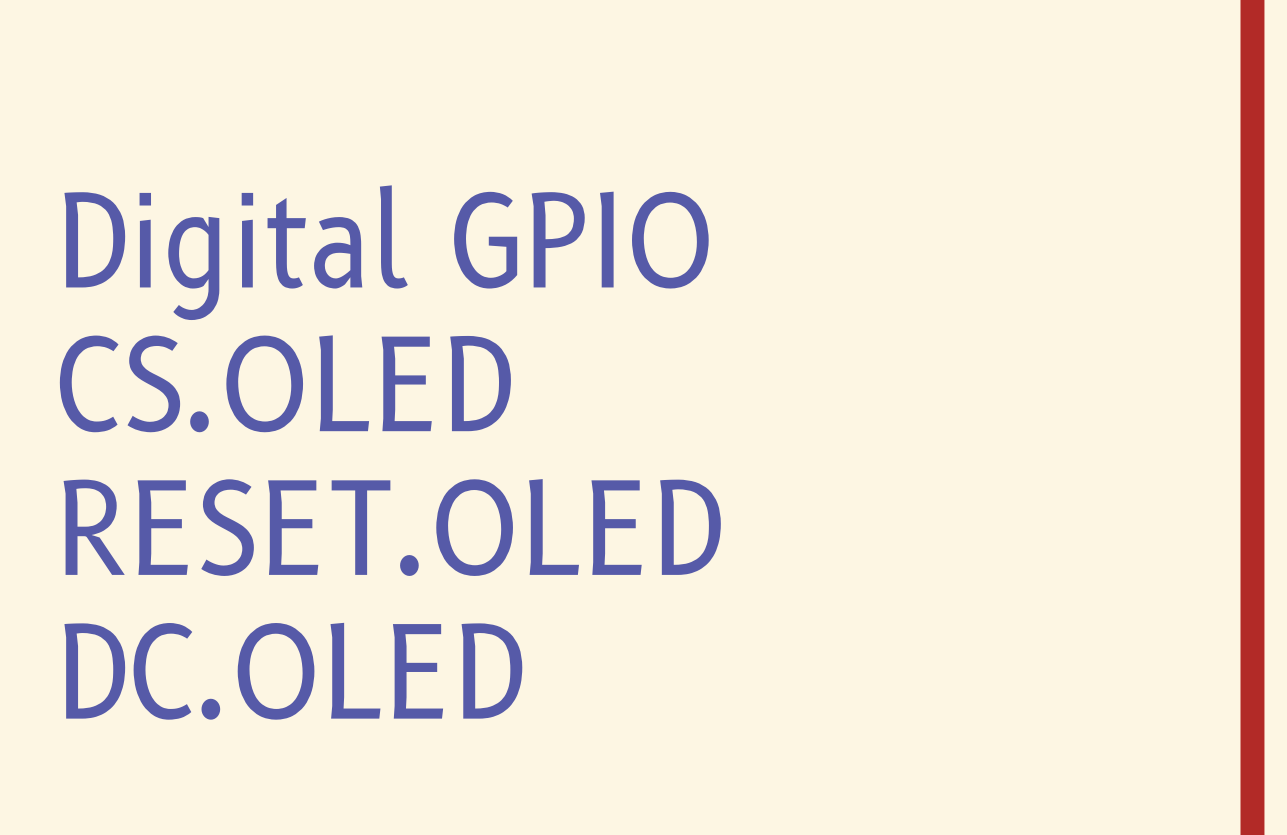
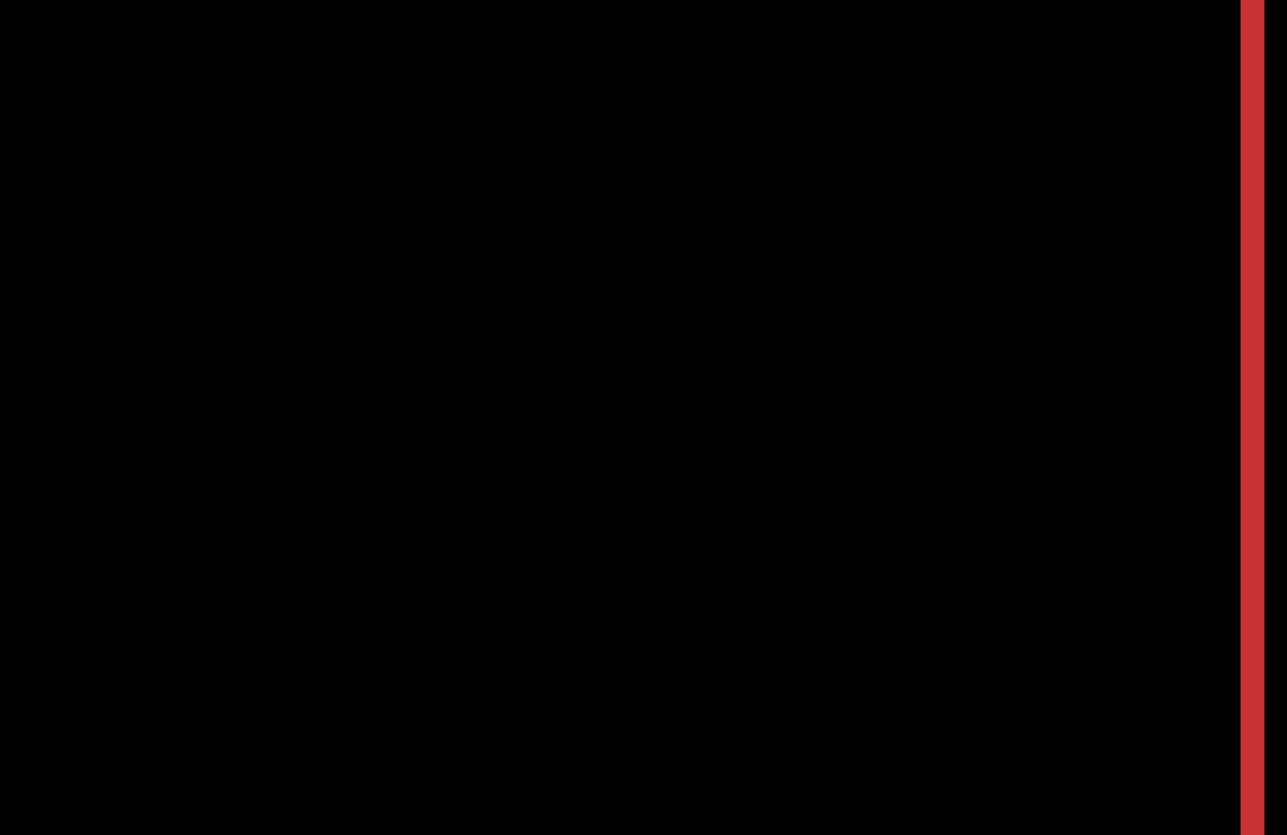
text: Digital GPIO (386, 252) -> none
text: CS.OLED (285, 383) -> none
text: RESET.OLED (392, 527) -> none
text: DC.OLED (293, 671) -> none

